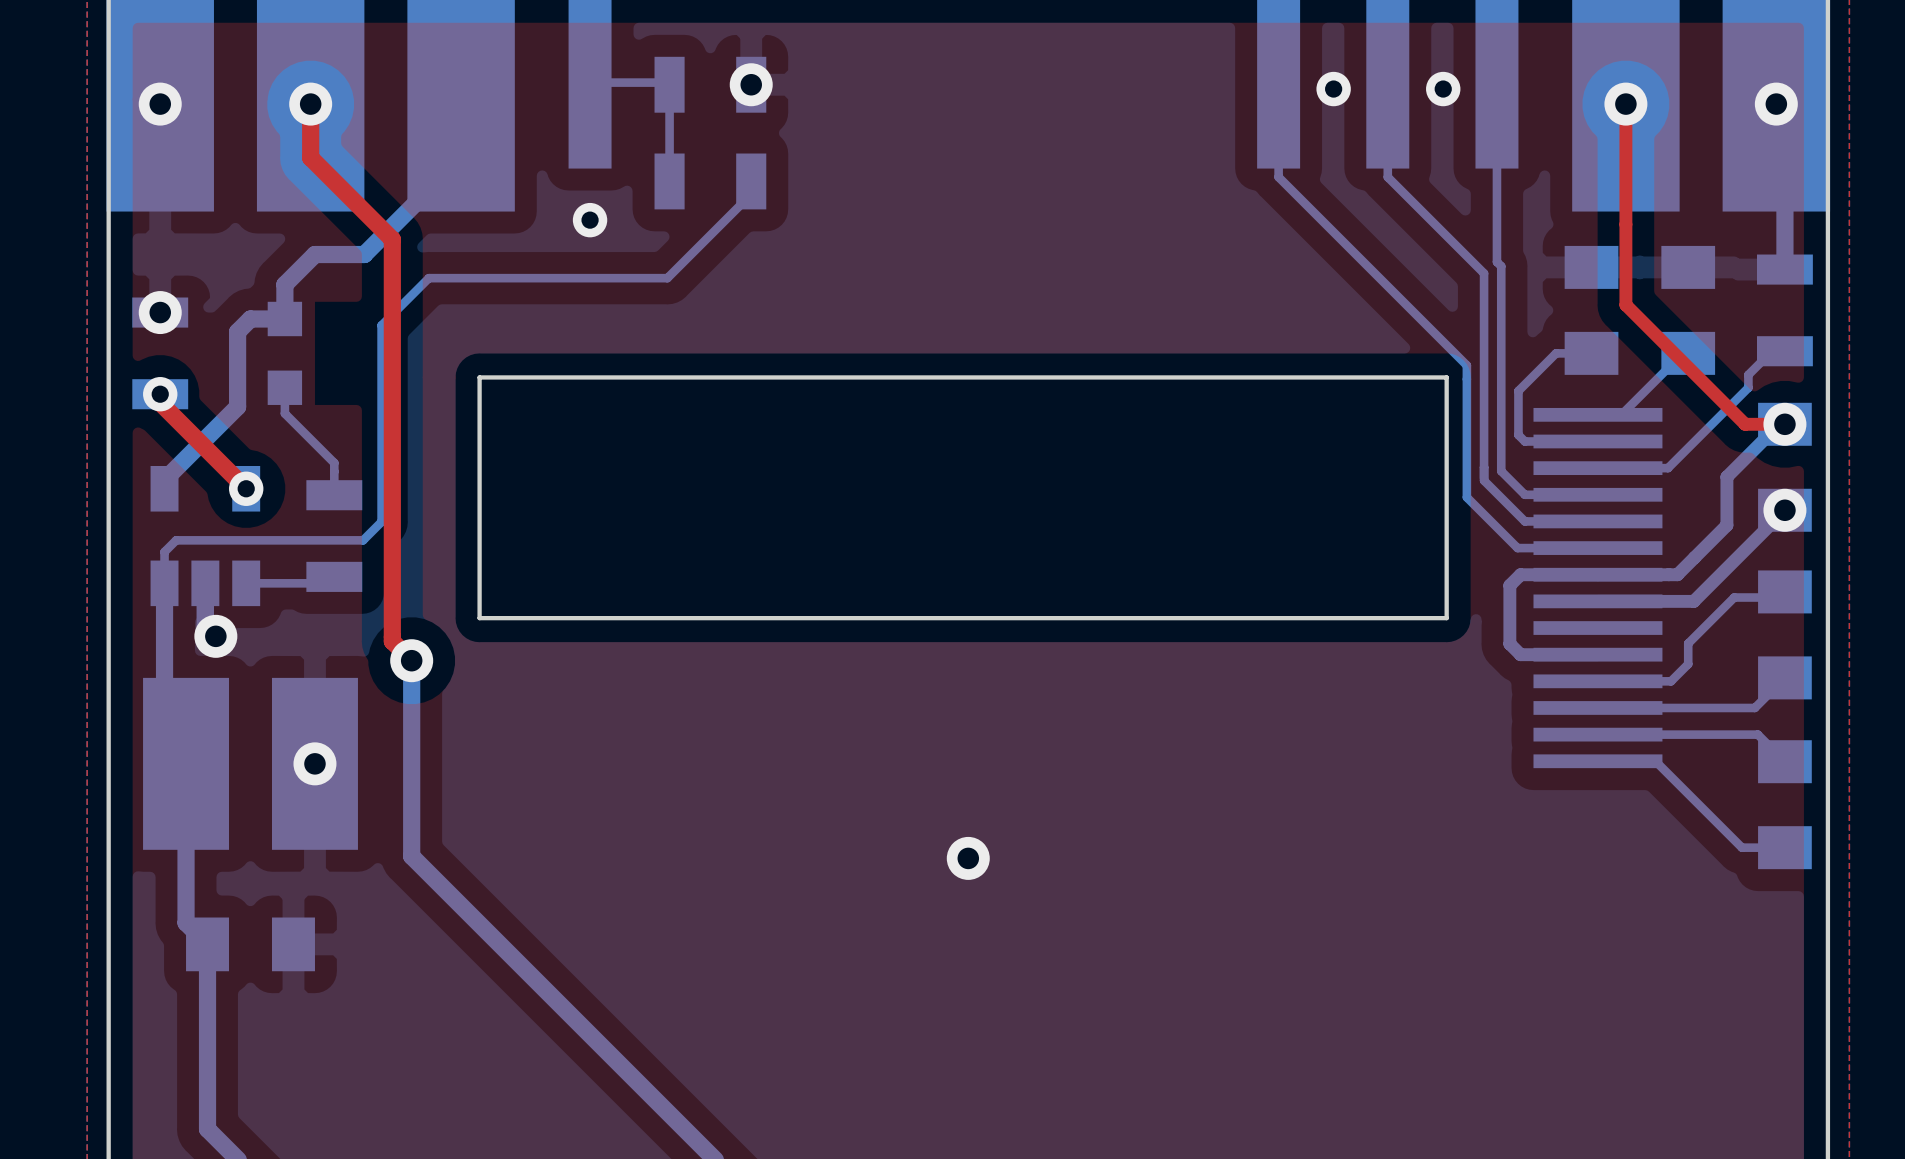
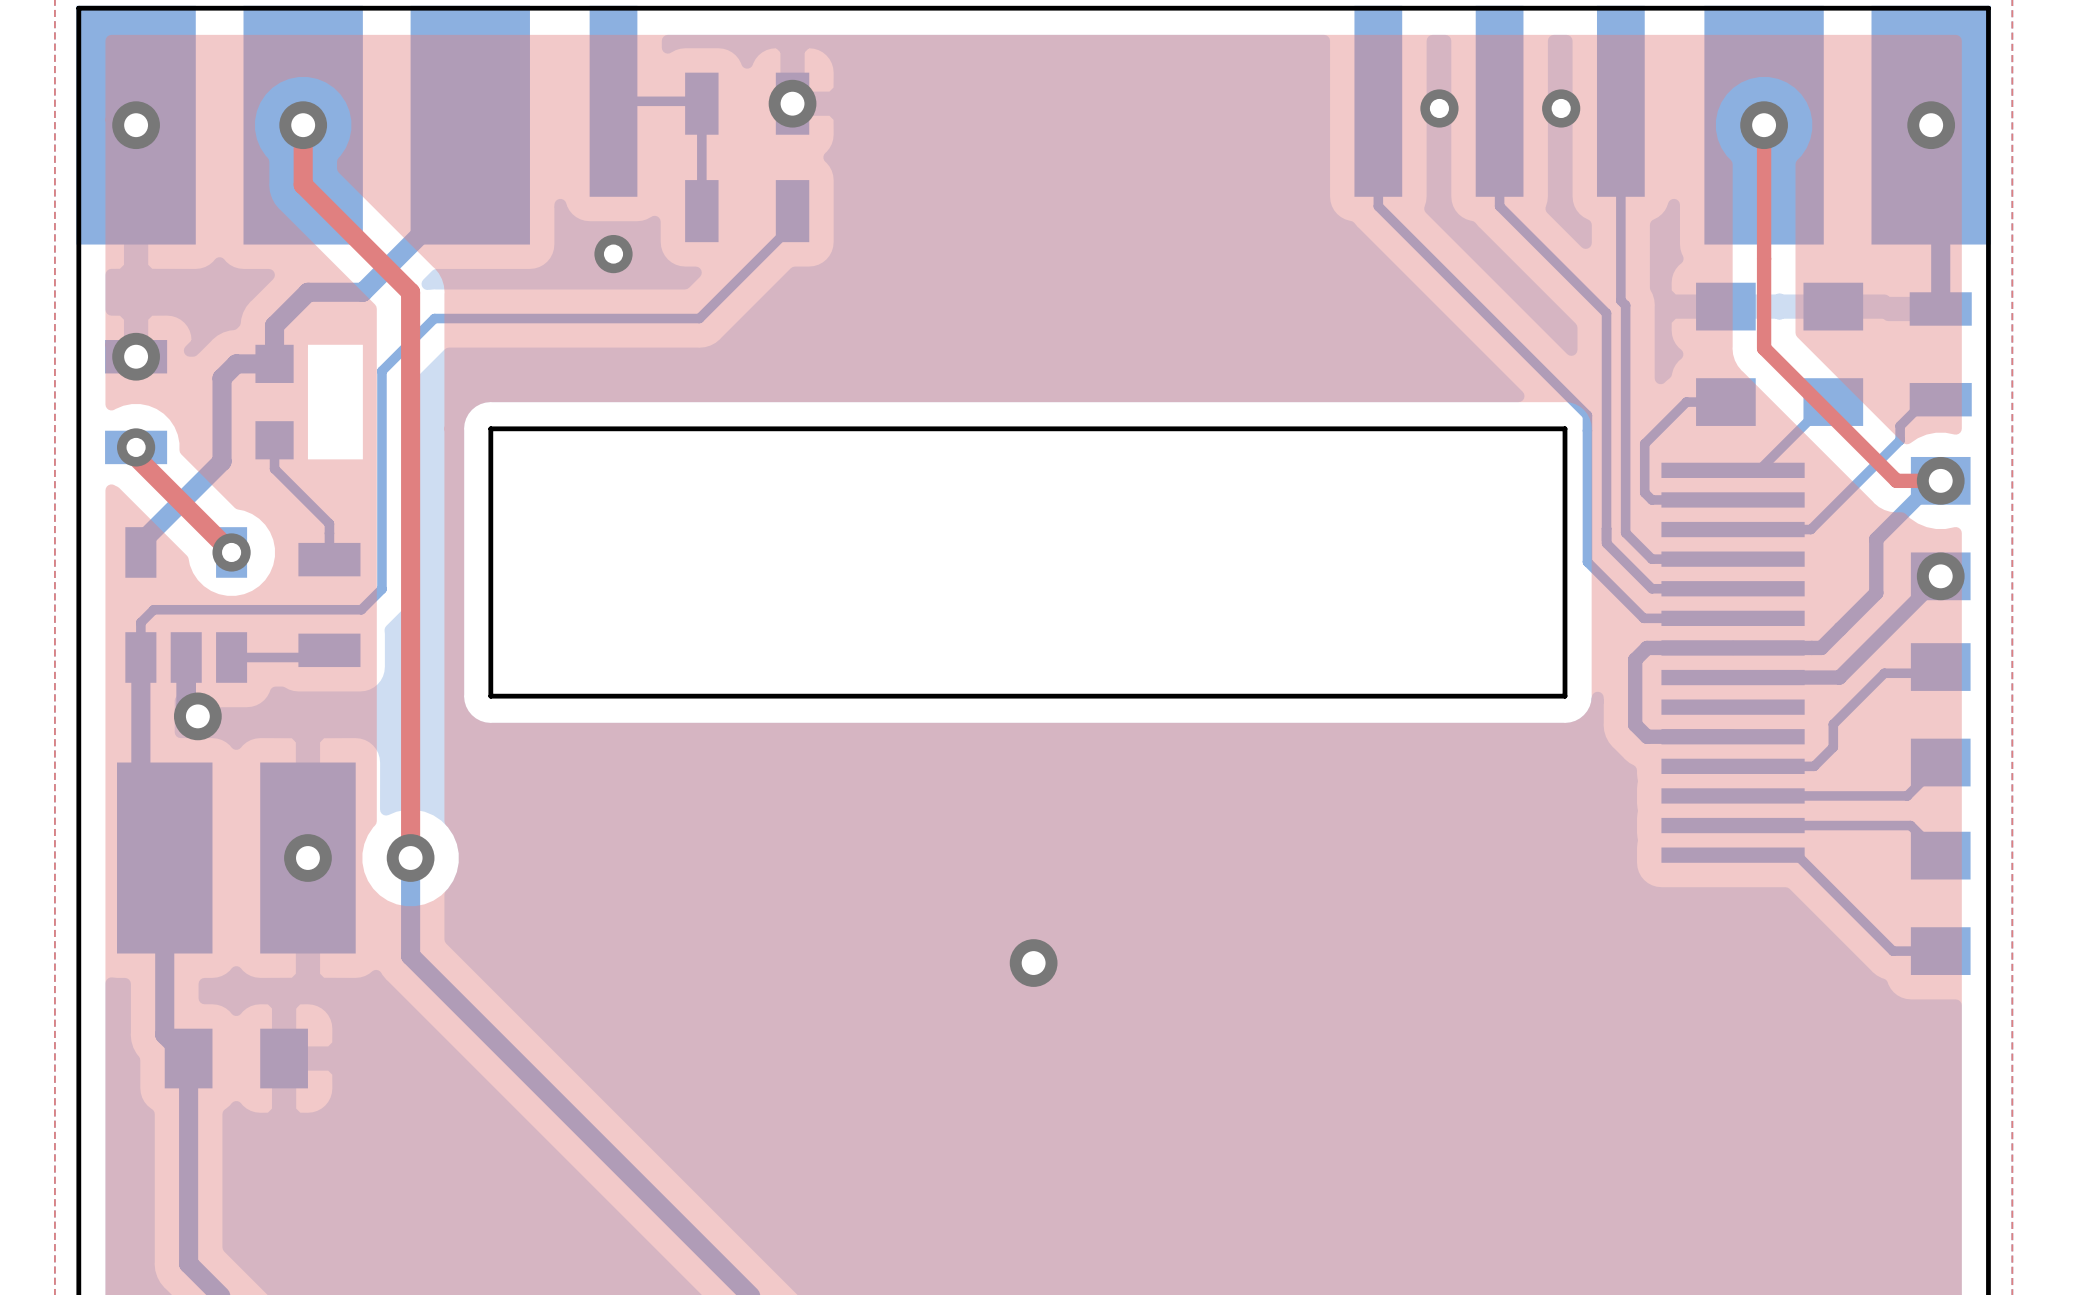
top track: (392, 239) (392, 641) (411, 660) -> (393, 275) (410, 292) (410, 858)
bottom track: (411, 660) (411, 856) -> (410, 858) (410, 955) (415, 960)
via position: (411, 660) -> (410, 858)

